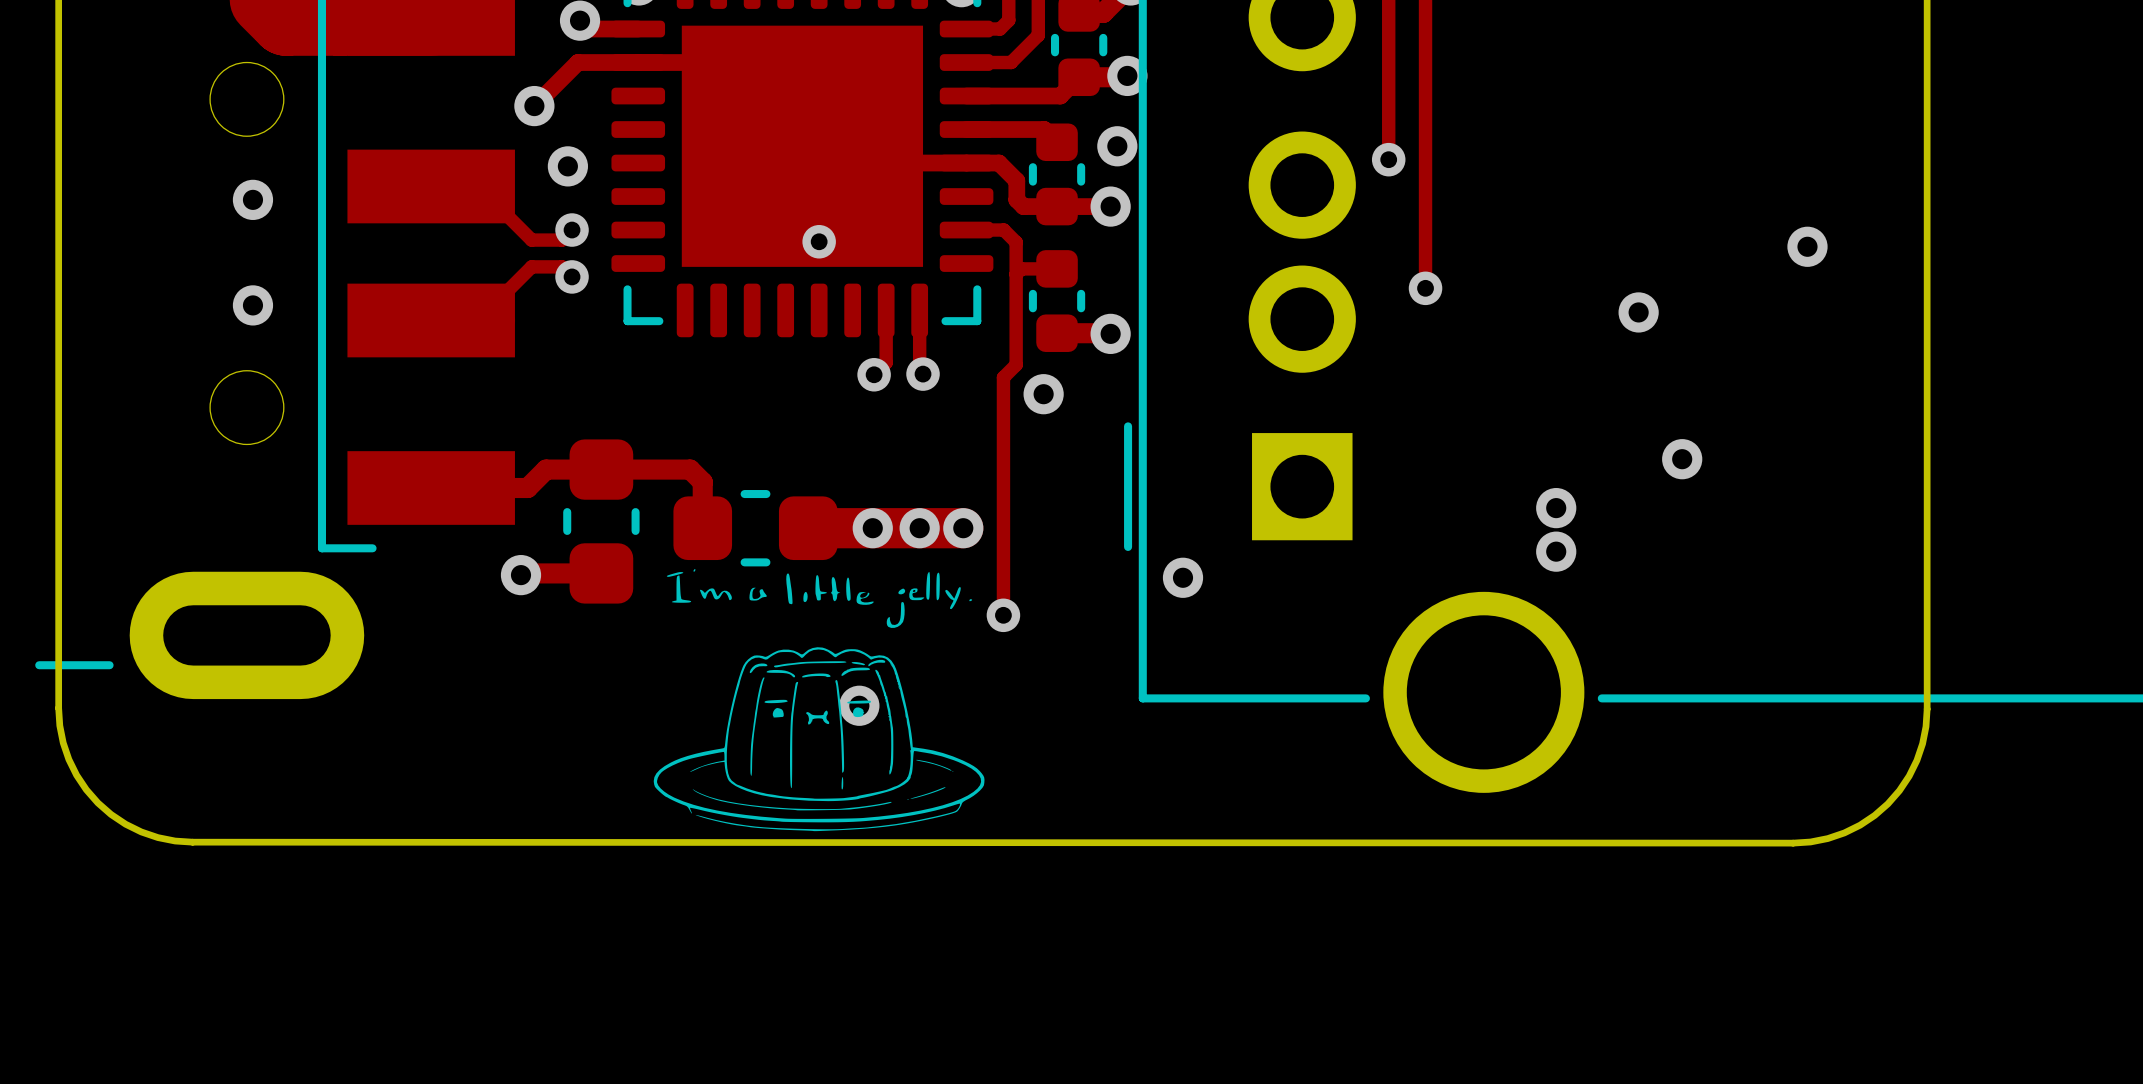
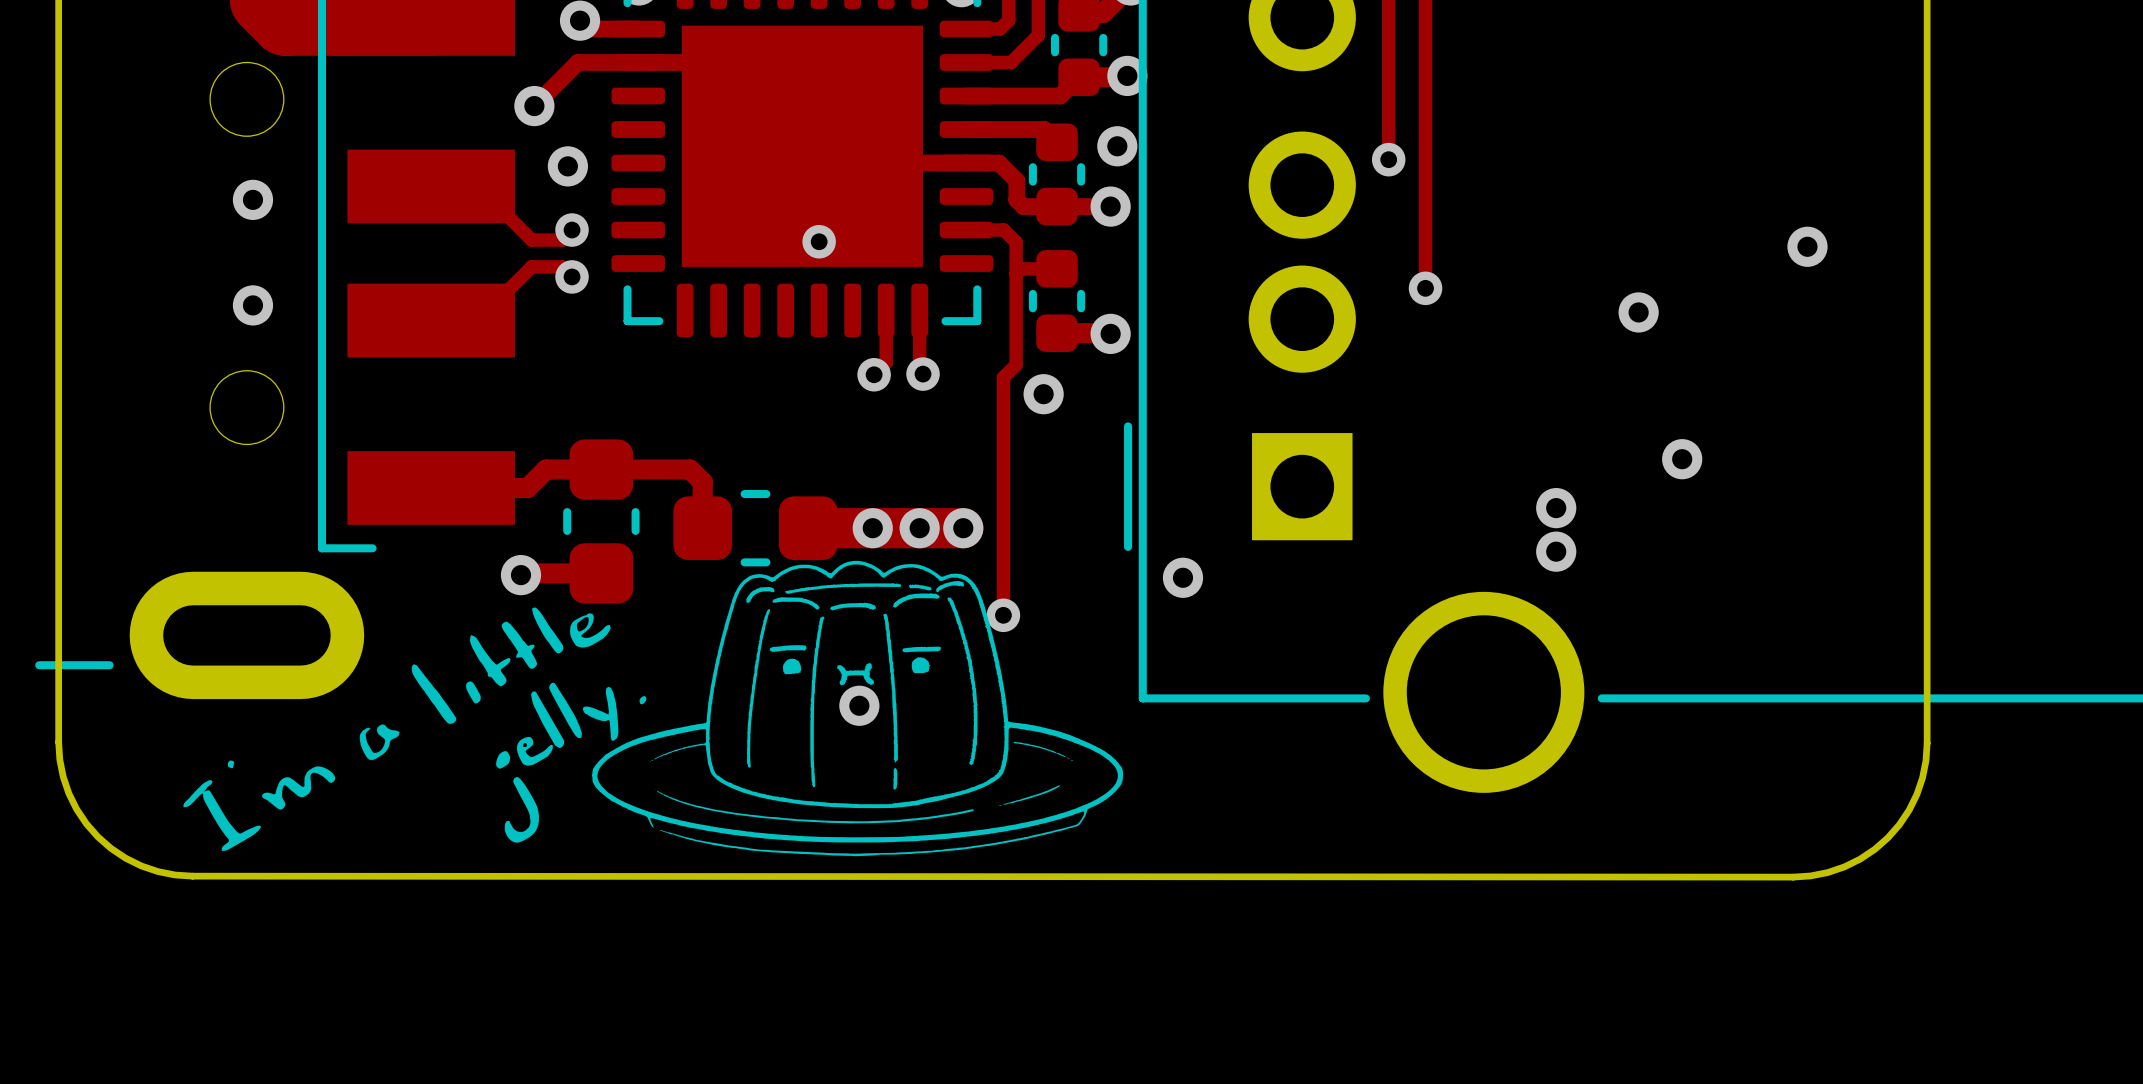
drawing shape: [653, 569, 985, 832] -> [591, 560, 1124, 857]
drawing: none -> [183, 607, 647, 851]
board edge: (58, 708) (63, 742) (68, 759) (86, 789) (111, 814) (125, 824) (141, 831) (175, 841) (1793, 843) (1827, 838) (1844, 832) (1860, 825) (1887, 803) (1909, 776) (1916, 760) (1922, 743) (1927, 709) -> (58, 708) (59, 759) (63, 776) (76, 809) (86, 823) (111, 848) (125, 858) (141, 865) (175, 875) (1793, 877) (1827, 872) (1860, 859) (1874, 849) (1899, 824) (1909, 810) (1922, 777) (1926, 760) (1927, 709)

